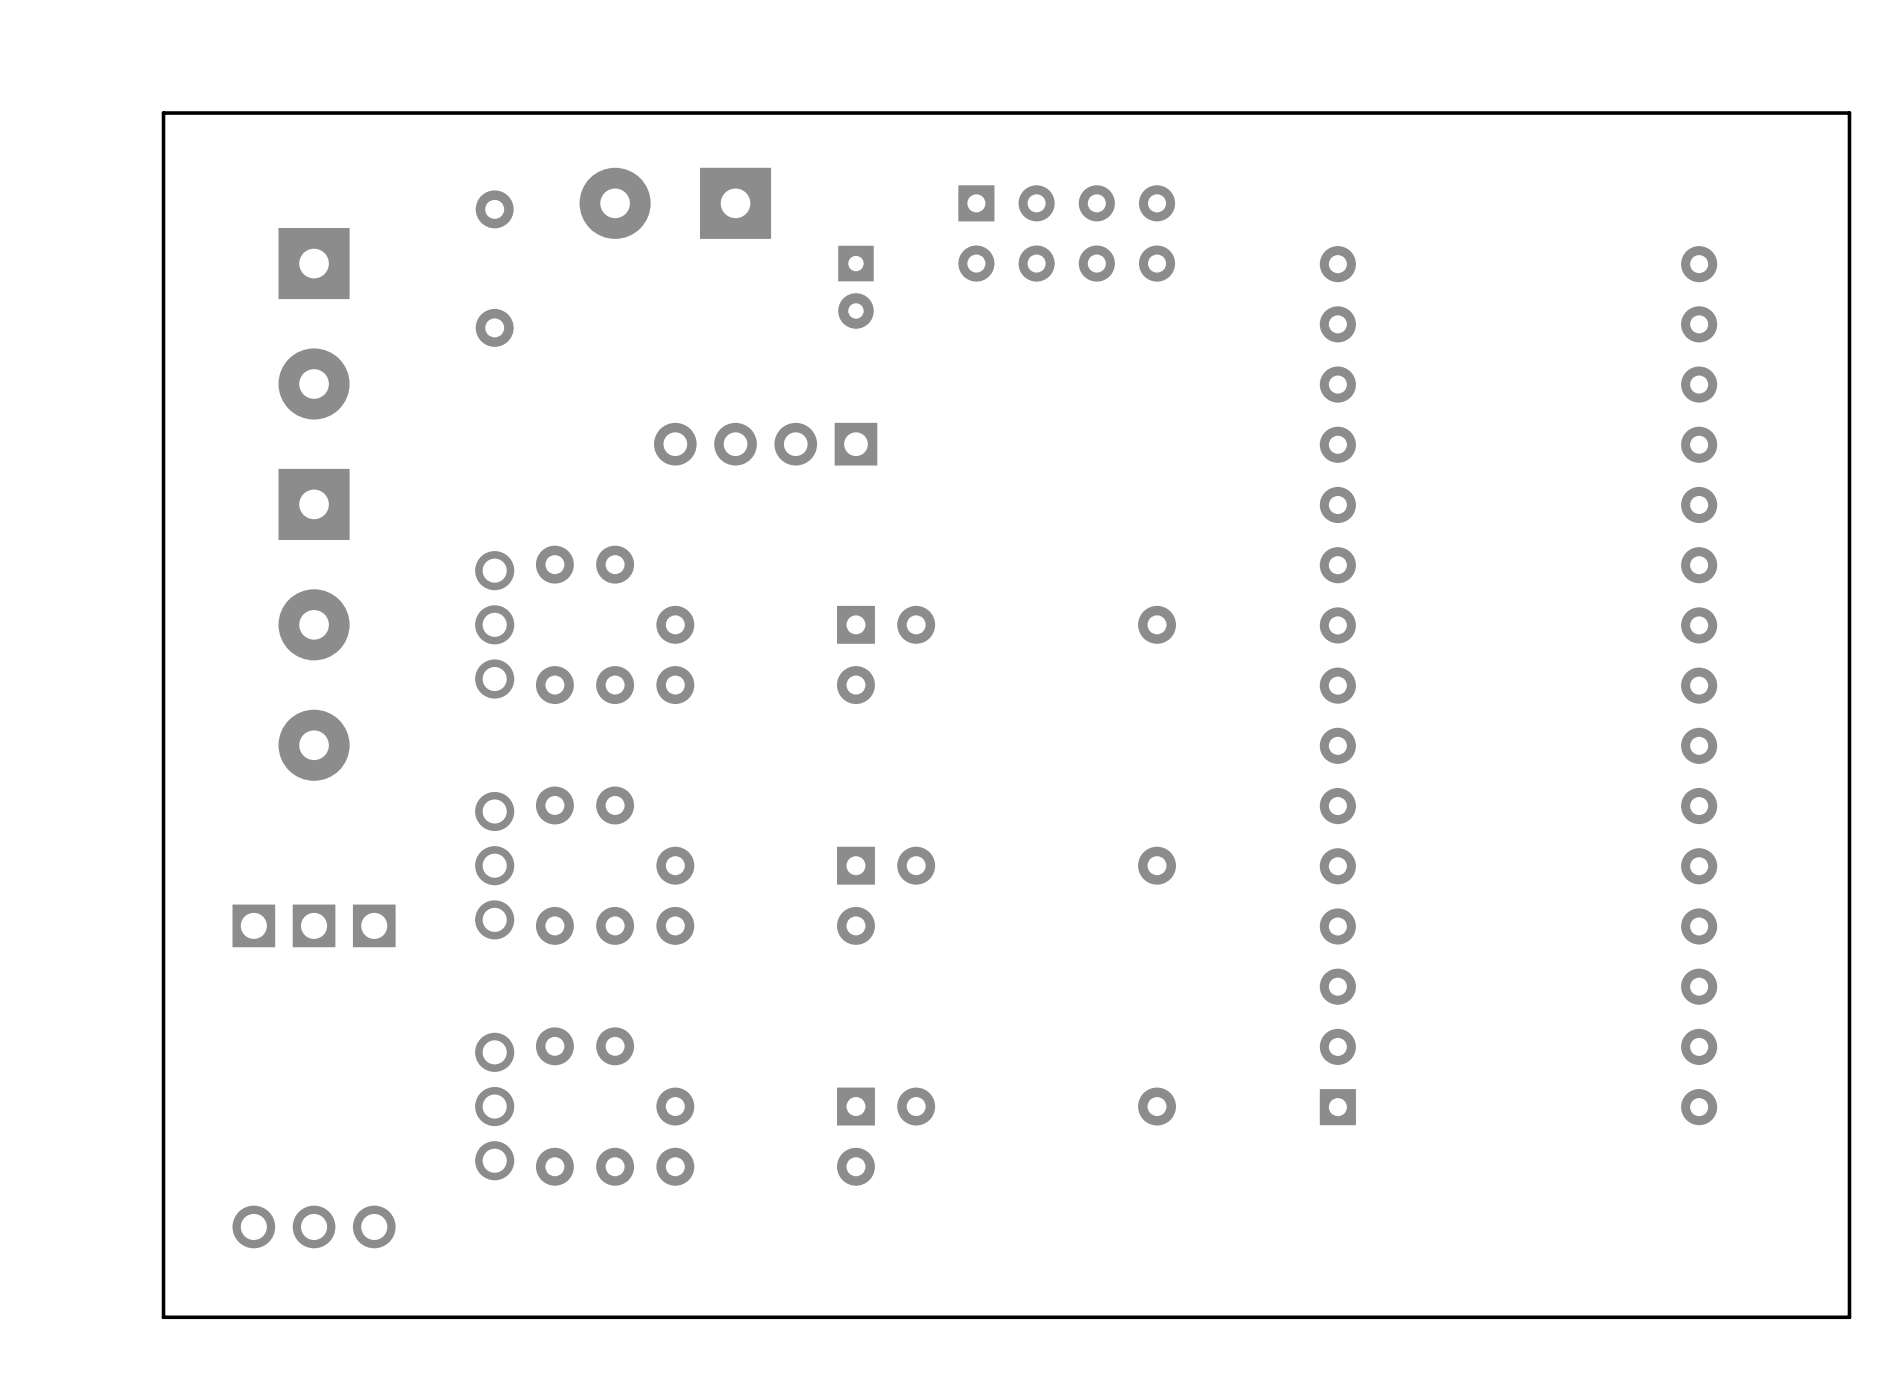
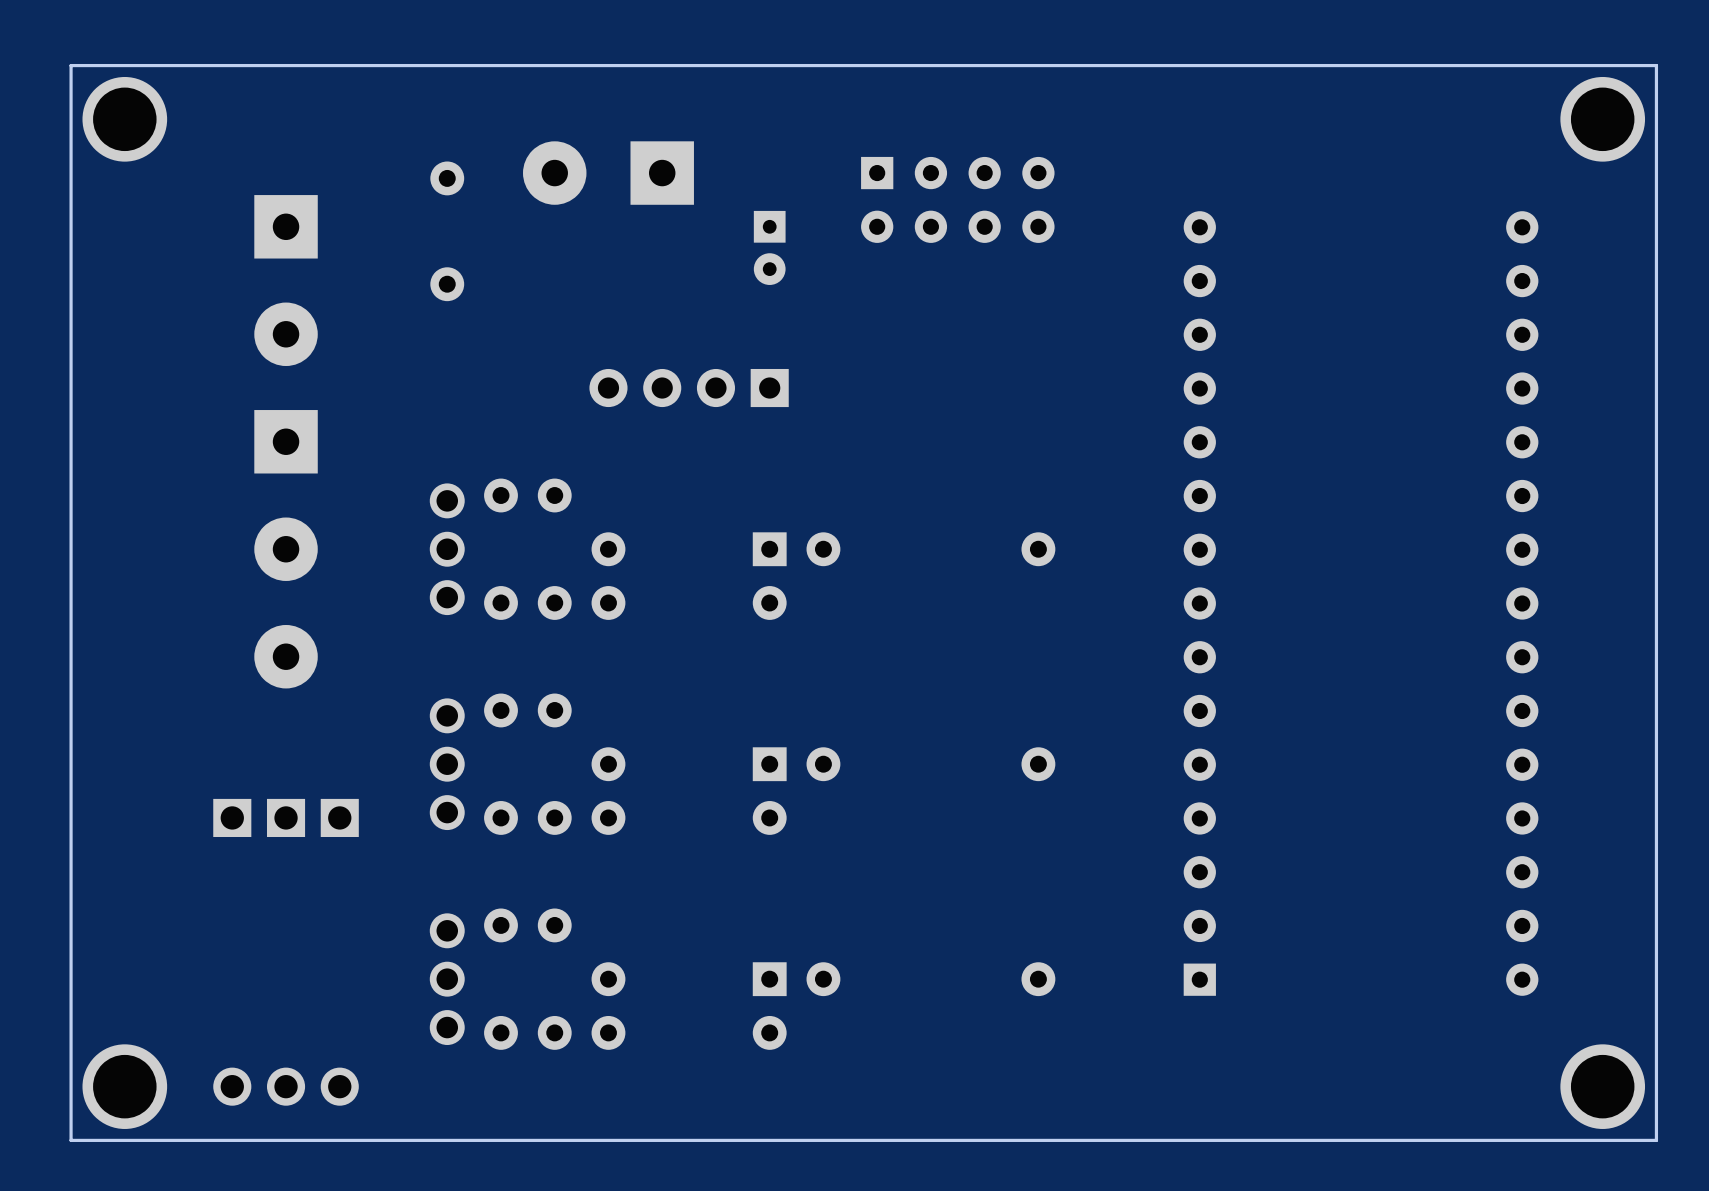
board edge: (1849, 113) (163, 113) (163, 1317) (1849, 1317) (1849, 1287) -> (1656, 92) (1656, 65) (71, 65) (71, 1140) (1656, 1140)
part: none -> (124, 119)
part: none -> (1602, 119)
part: none -> (124, 1086)
part: none -> (1602, 1086)

